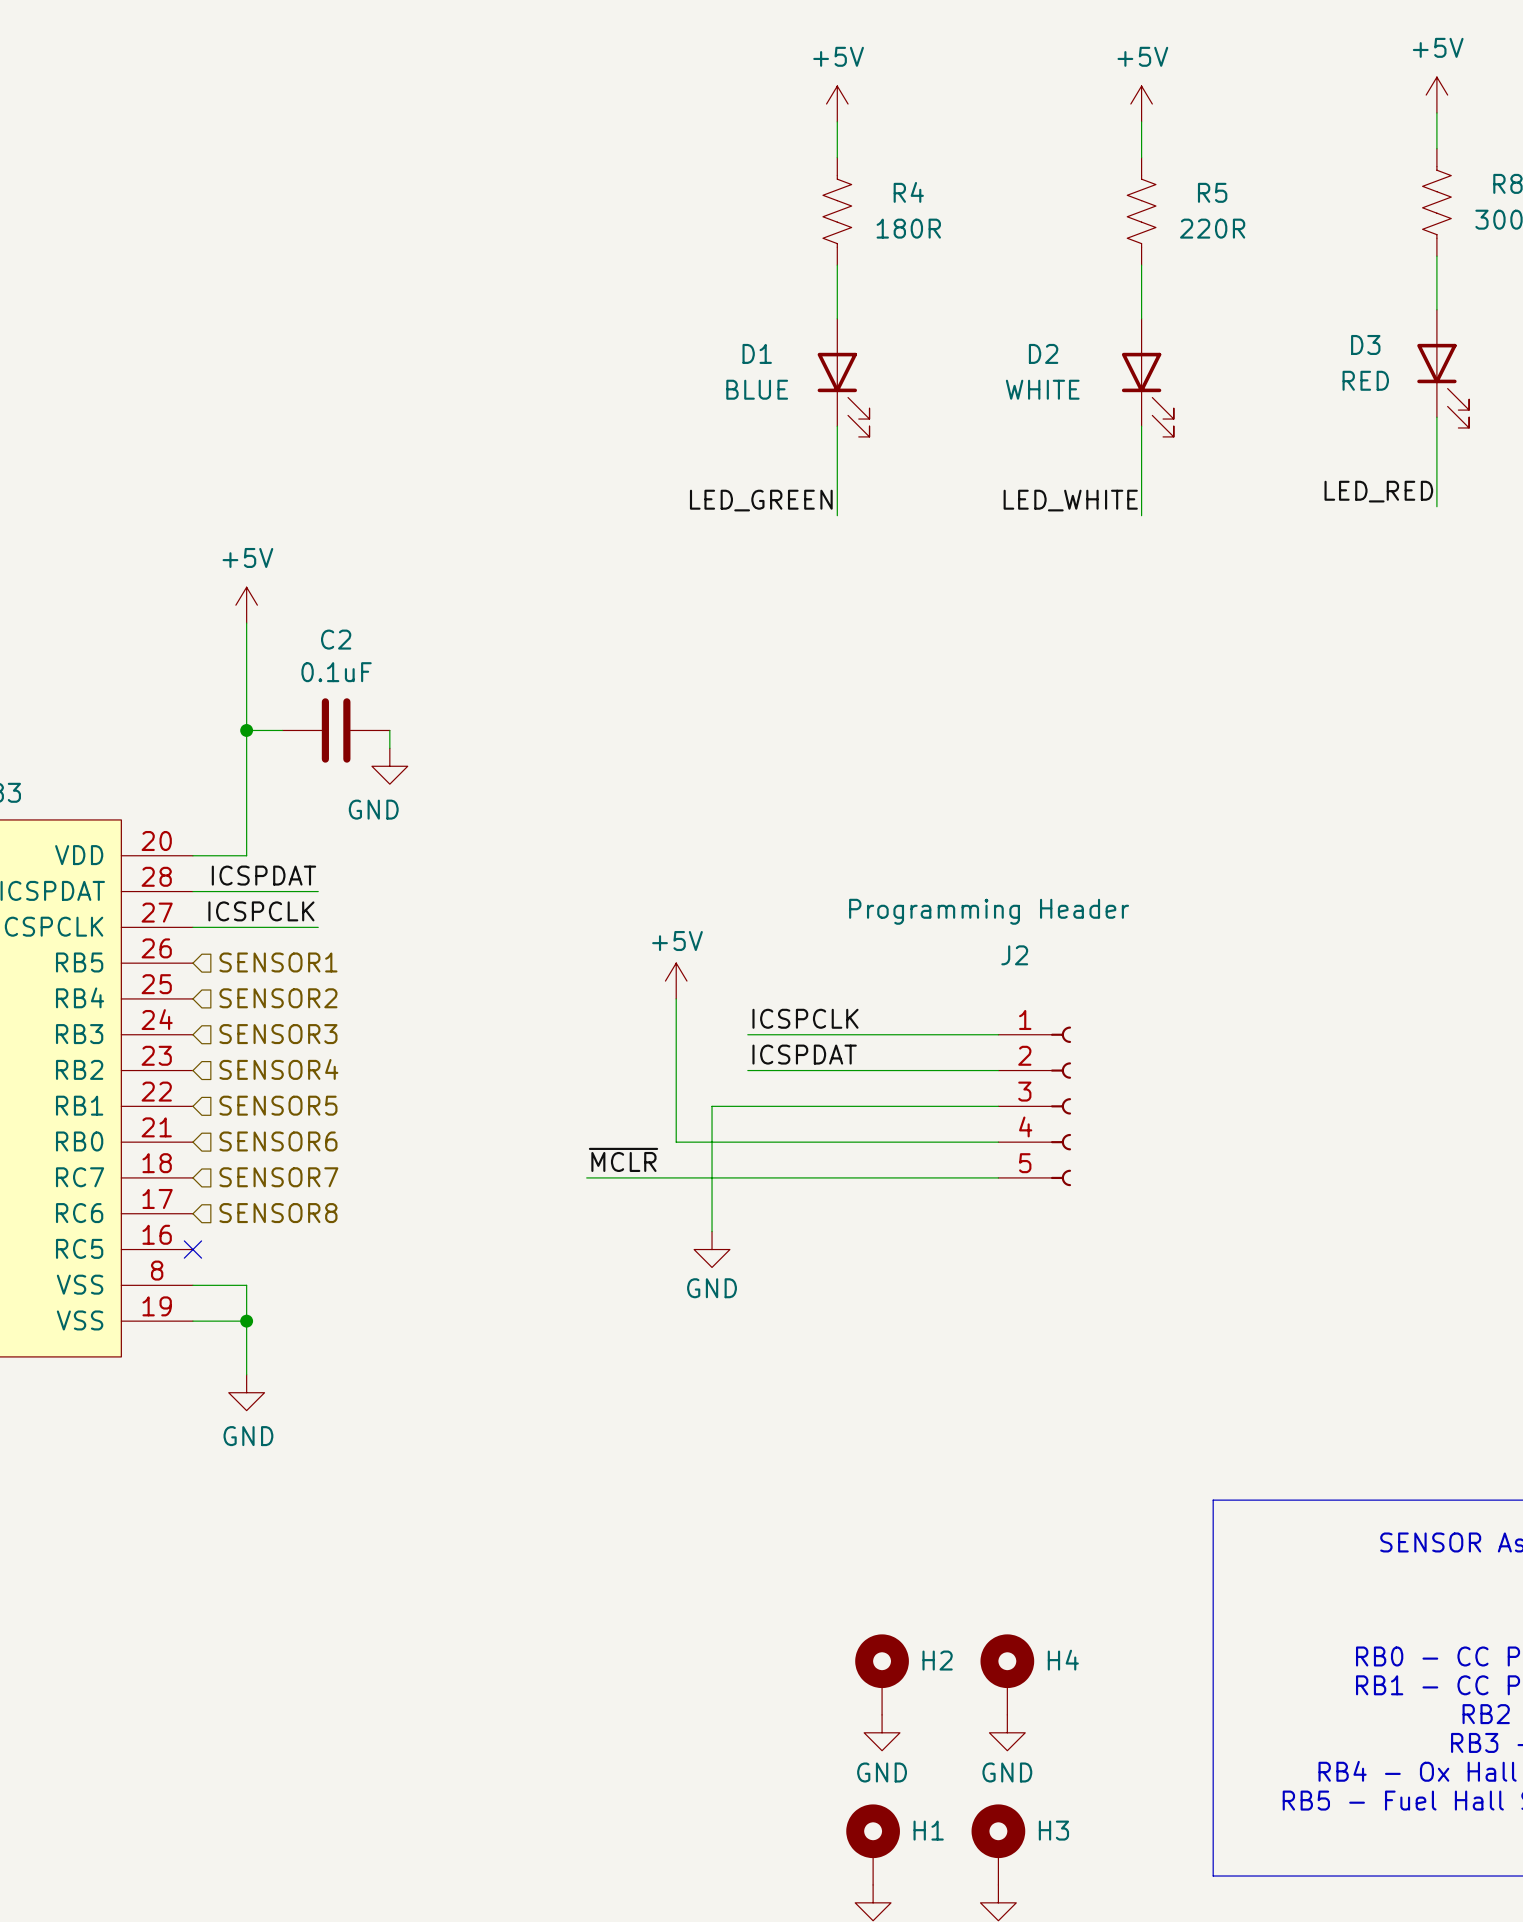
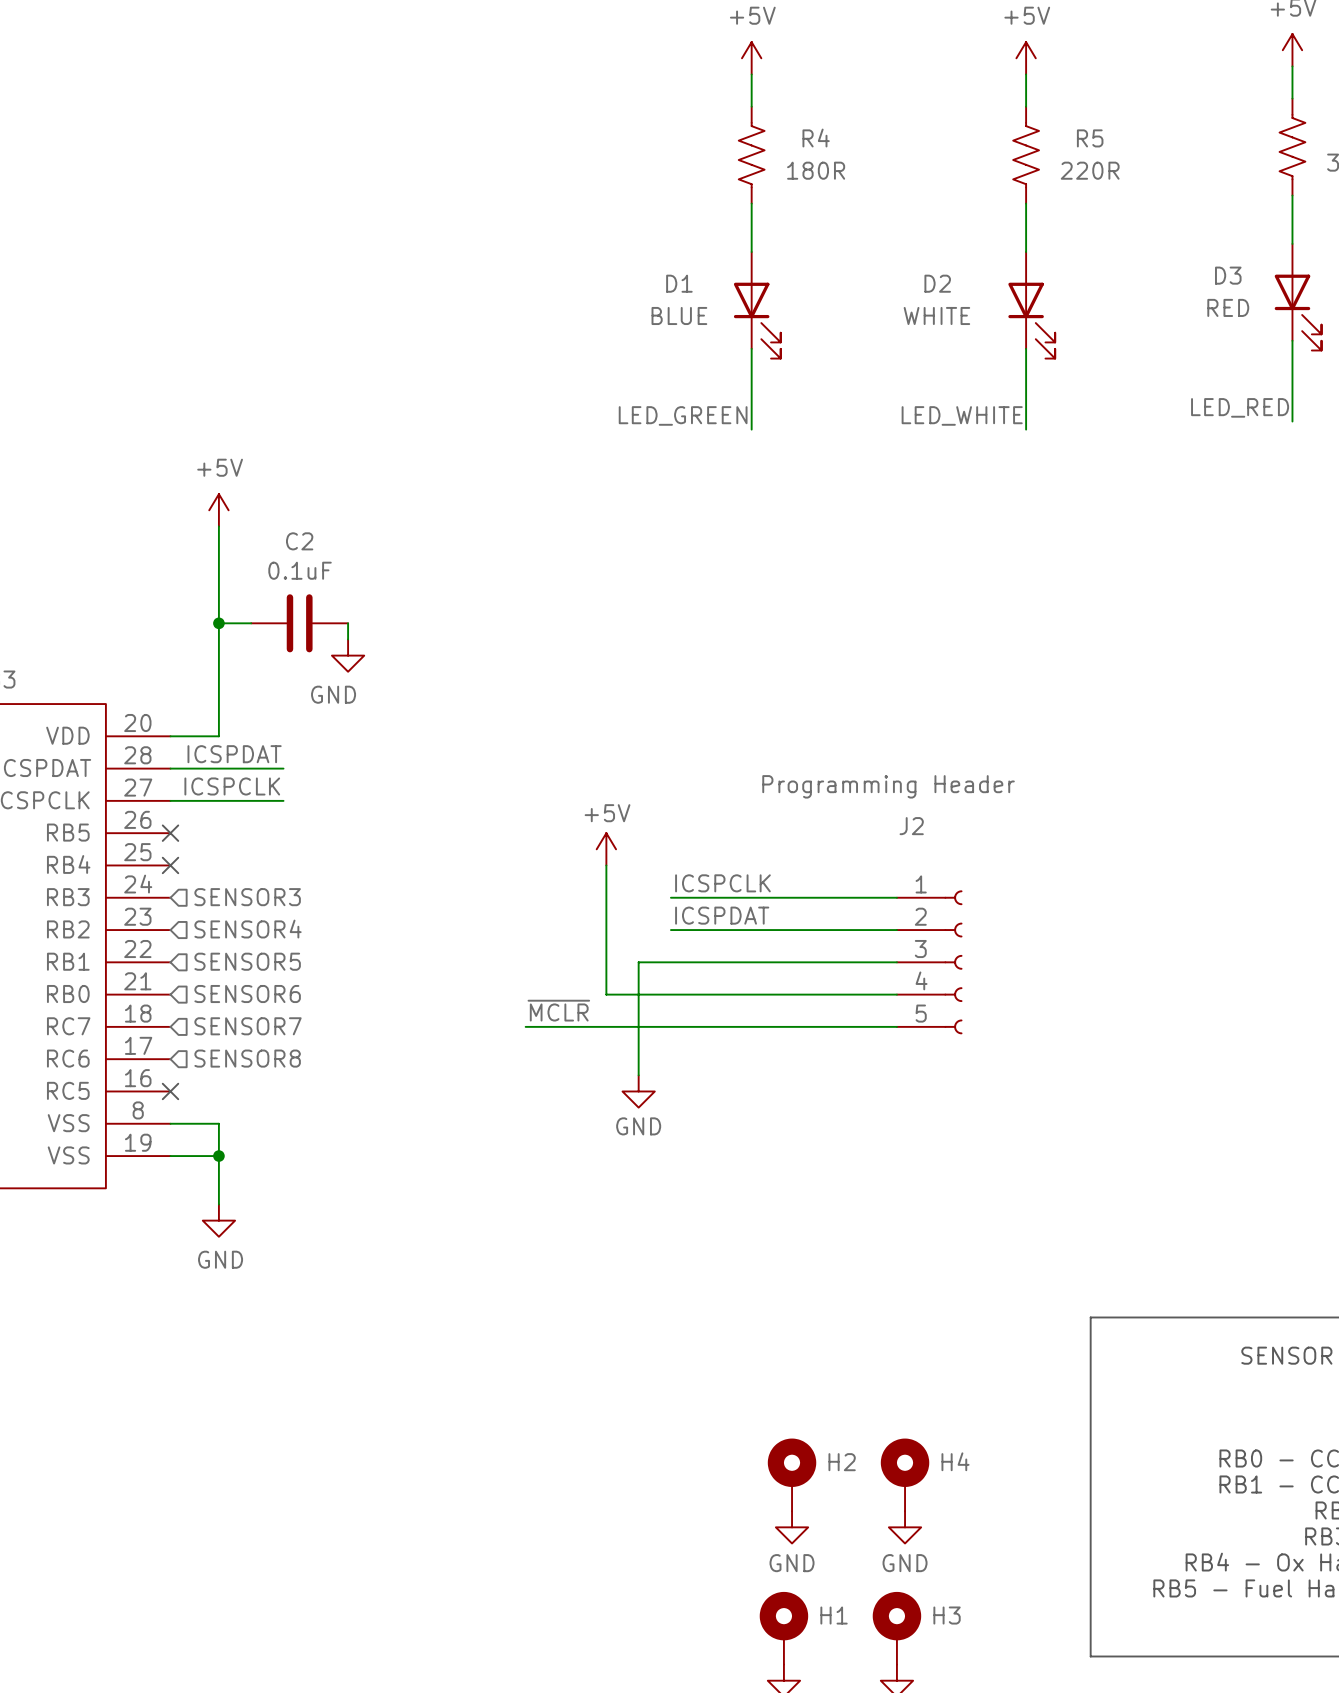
hierarchical label: SENSOR1 (278, 962) -> none
no-connect mark: none -> (170, 833)
no-connect mark: none -> (170, 865)
hierarchical label: SENSOR2 (278, 998) -> none

